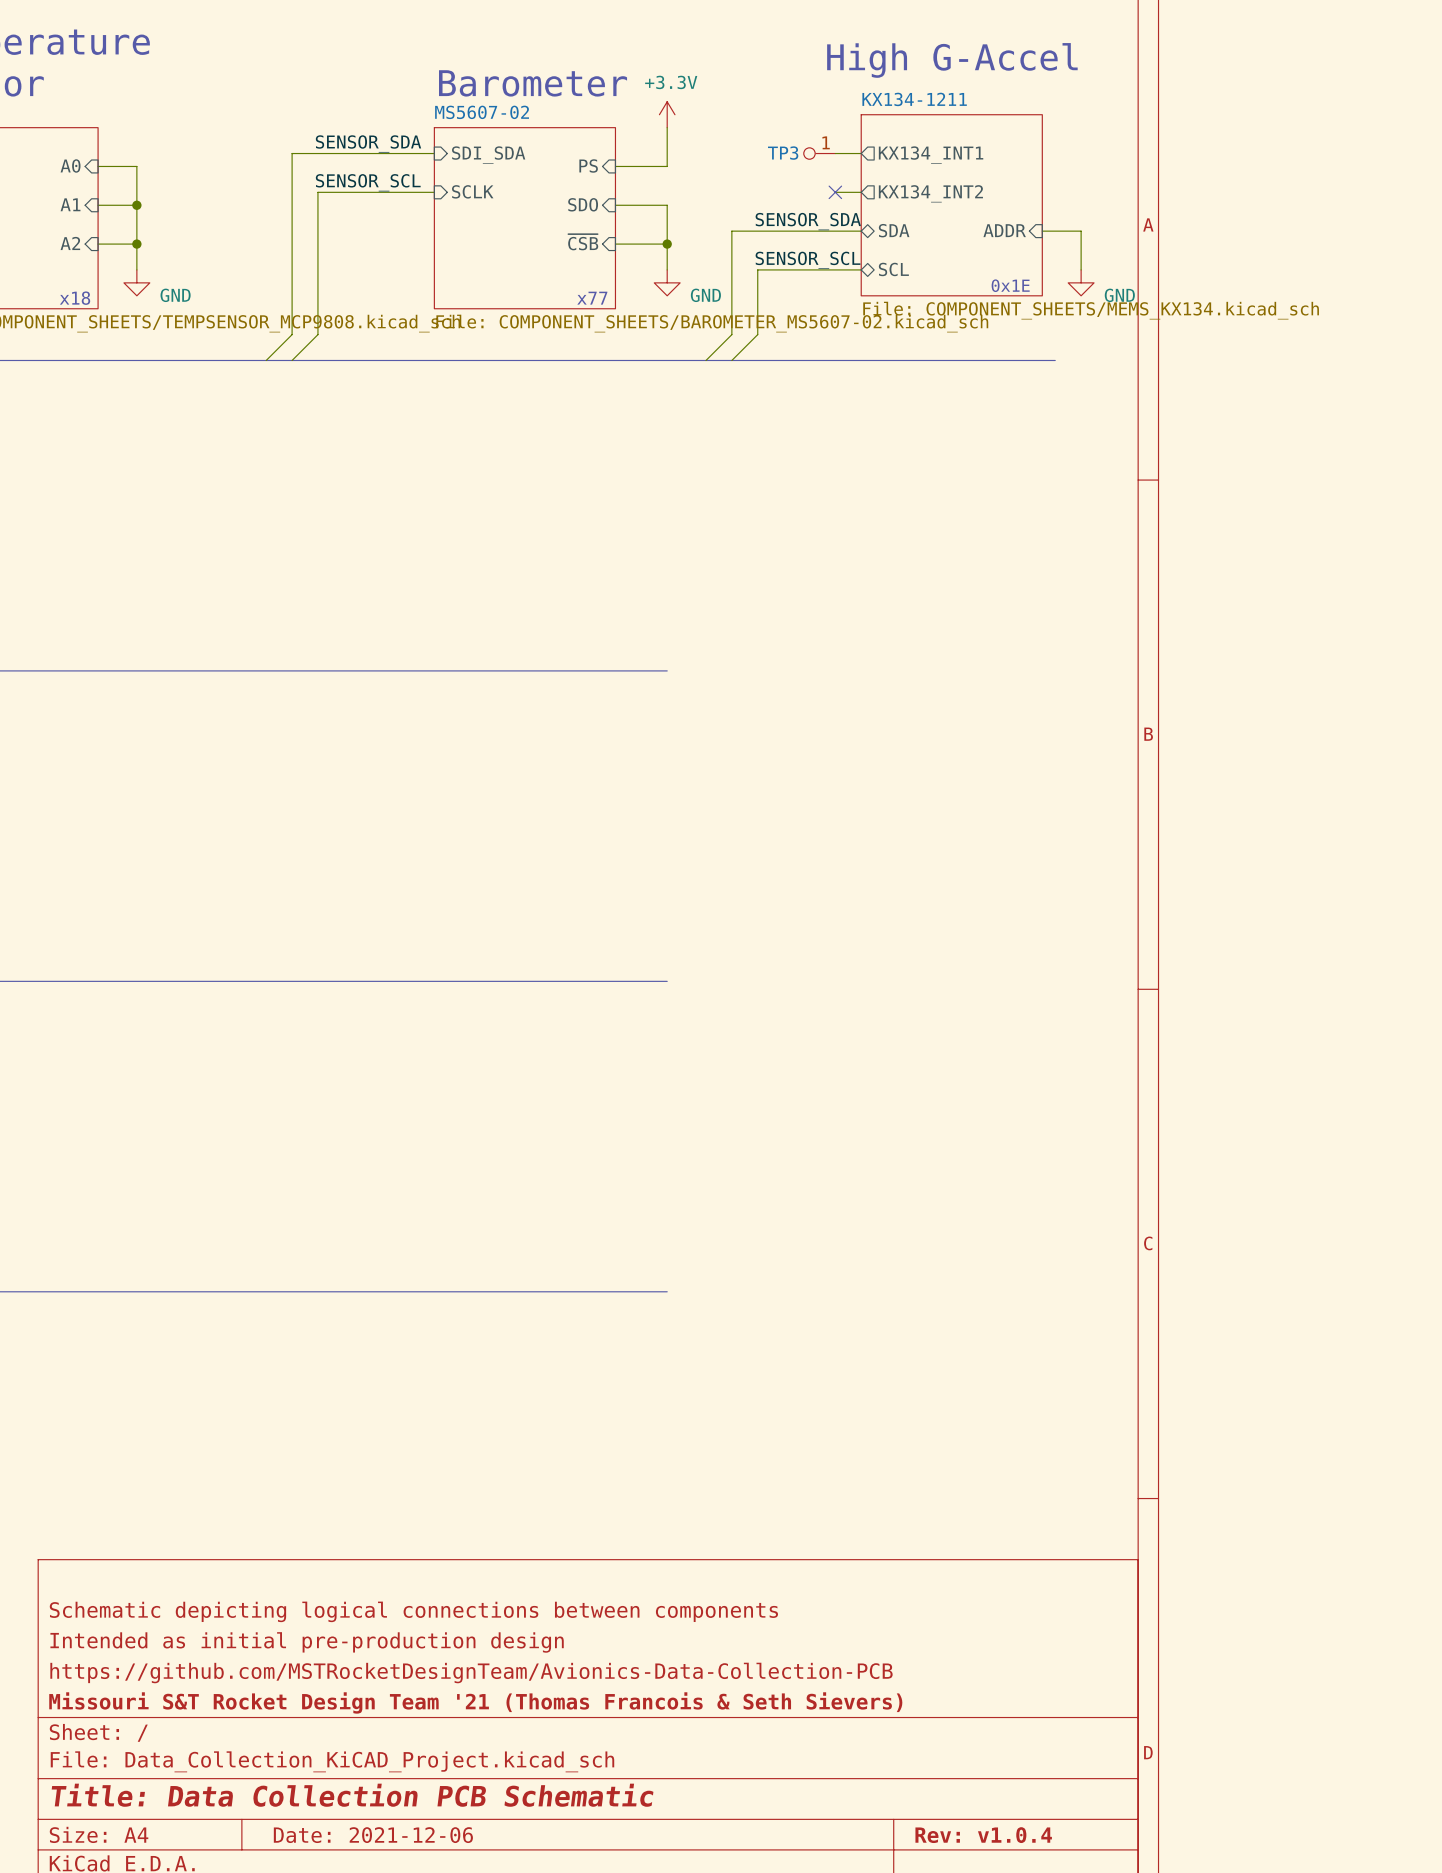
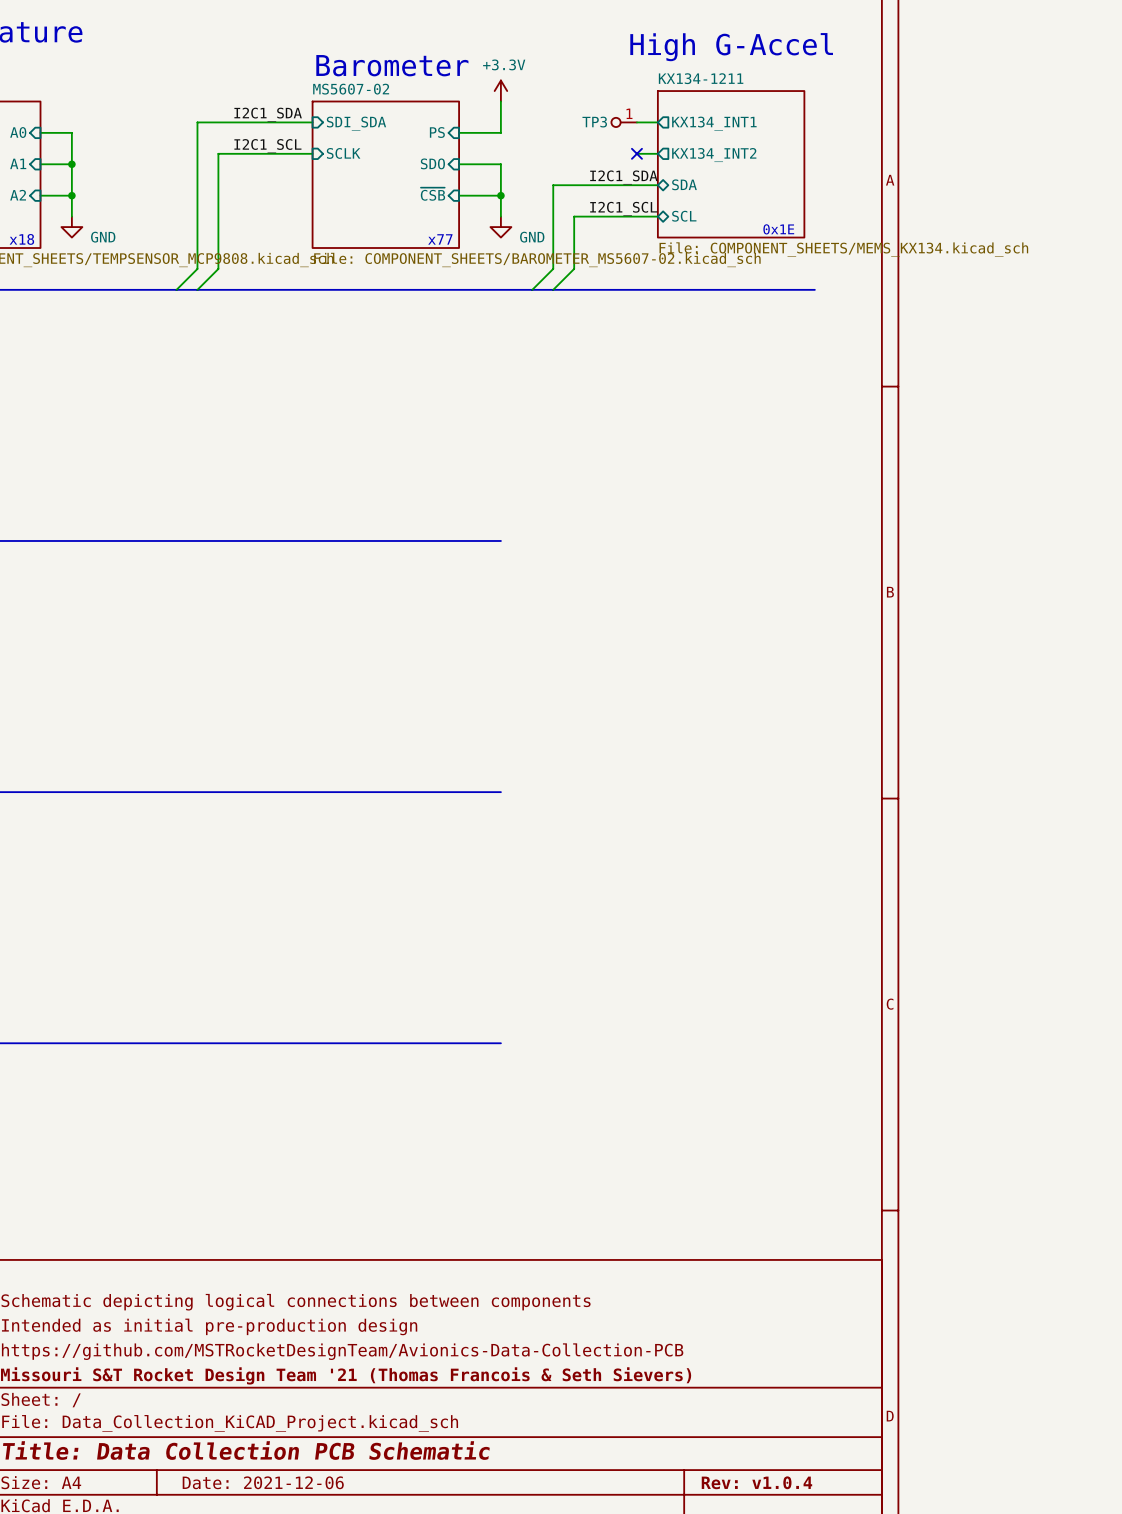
label: SENSOR_SDA (368, 143) -> I2C1_SDA (268, 114)
label: SENSOR_SCL (368, 182) -> I2C1_SCL (267, 146)
label: SENSOR_SDA (808, 221) -> I2C1_SDA (623, 177)
sheet pin: ADDR (1004, 230) -> none
wire: (1042, 231) (1081, 231) (1081, 269) -> none
label: SENSOR_SCL (808, 260) -> I2C1_SCL (623, 208)
power symbol: GND (1081, 282) -> none

